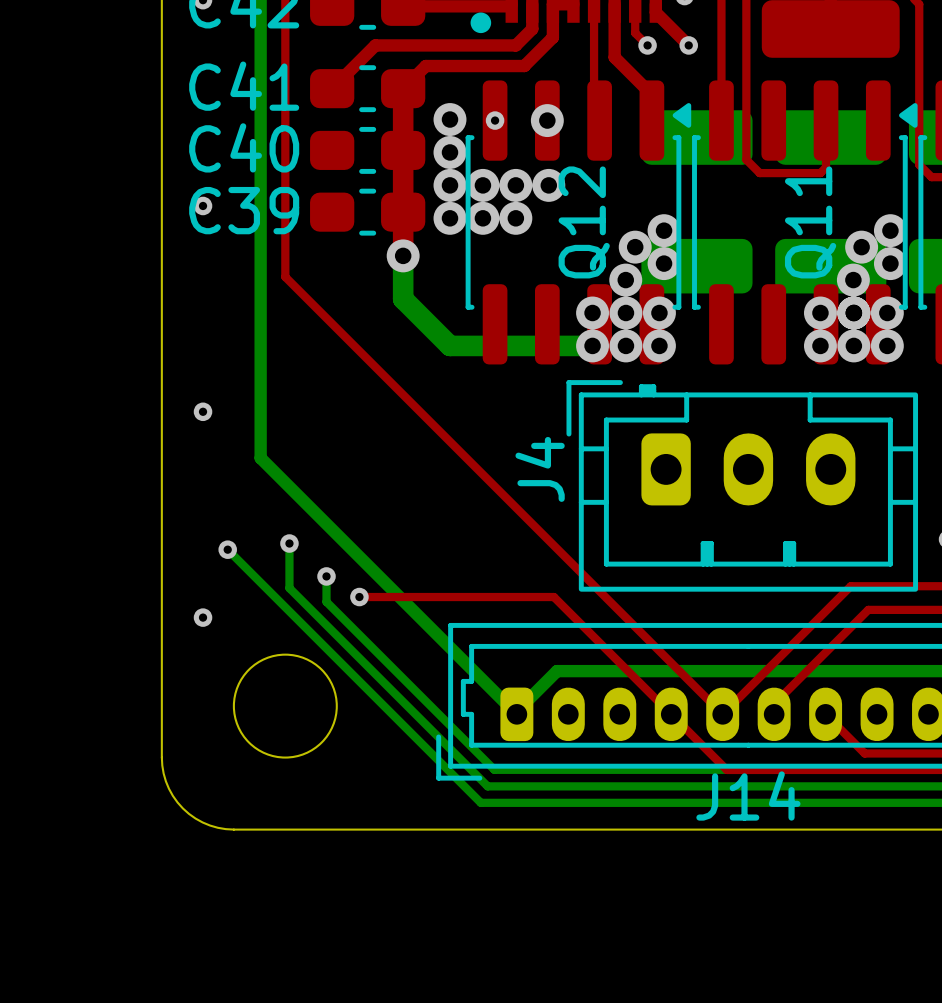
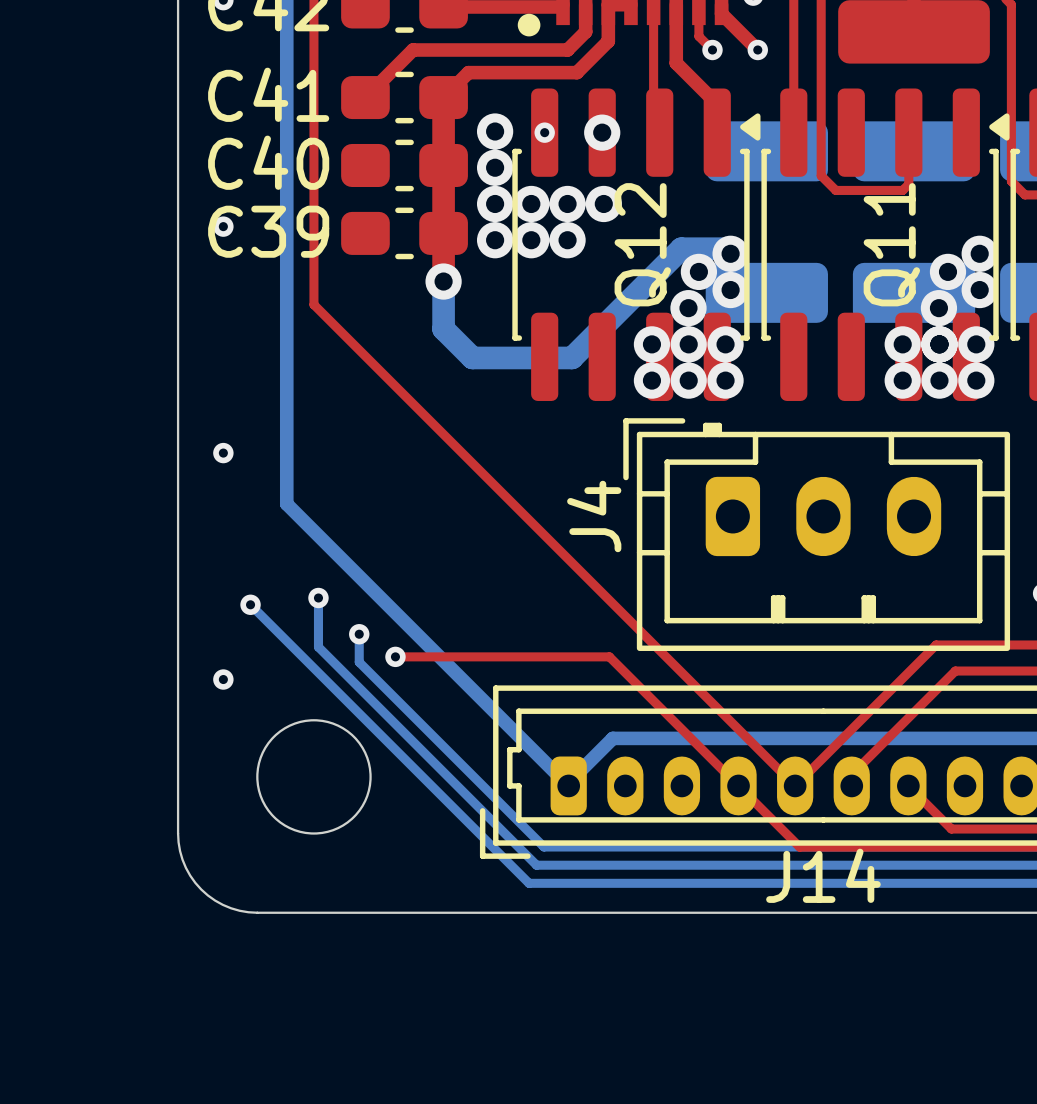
bottom track: (429, 325) (449, 345) (592, 345) -> (472, 357) (572, 357) (681, 248) (732, 248)

